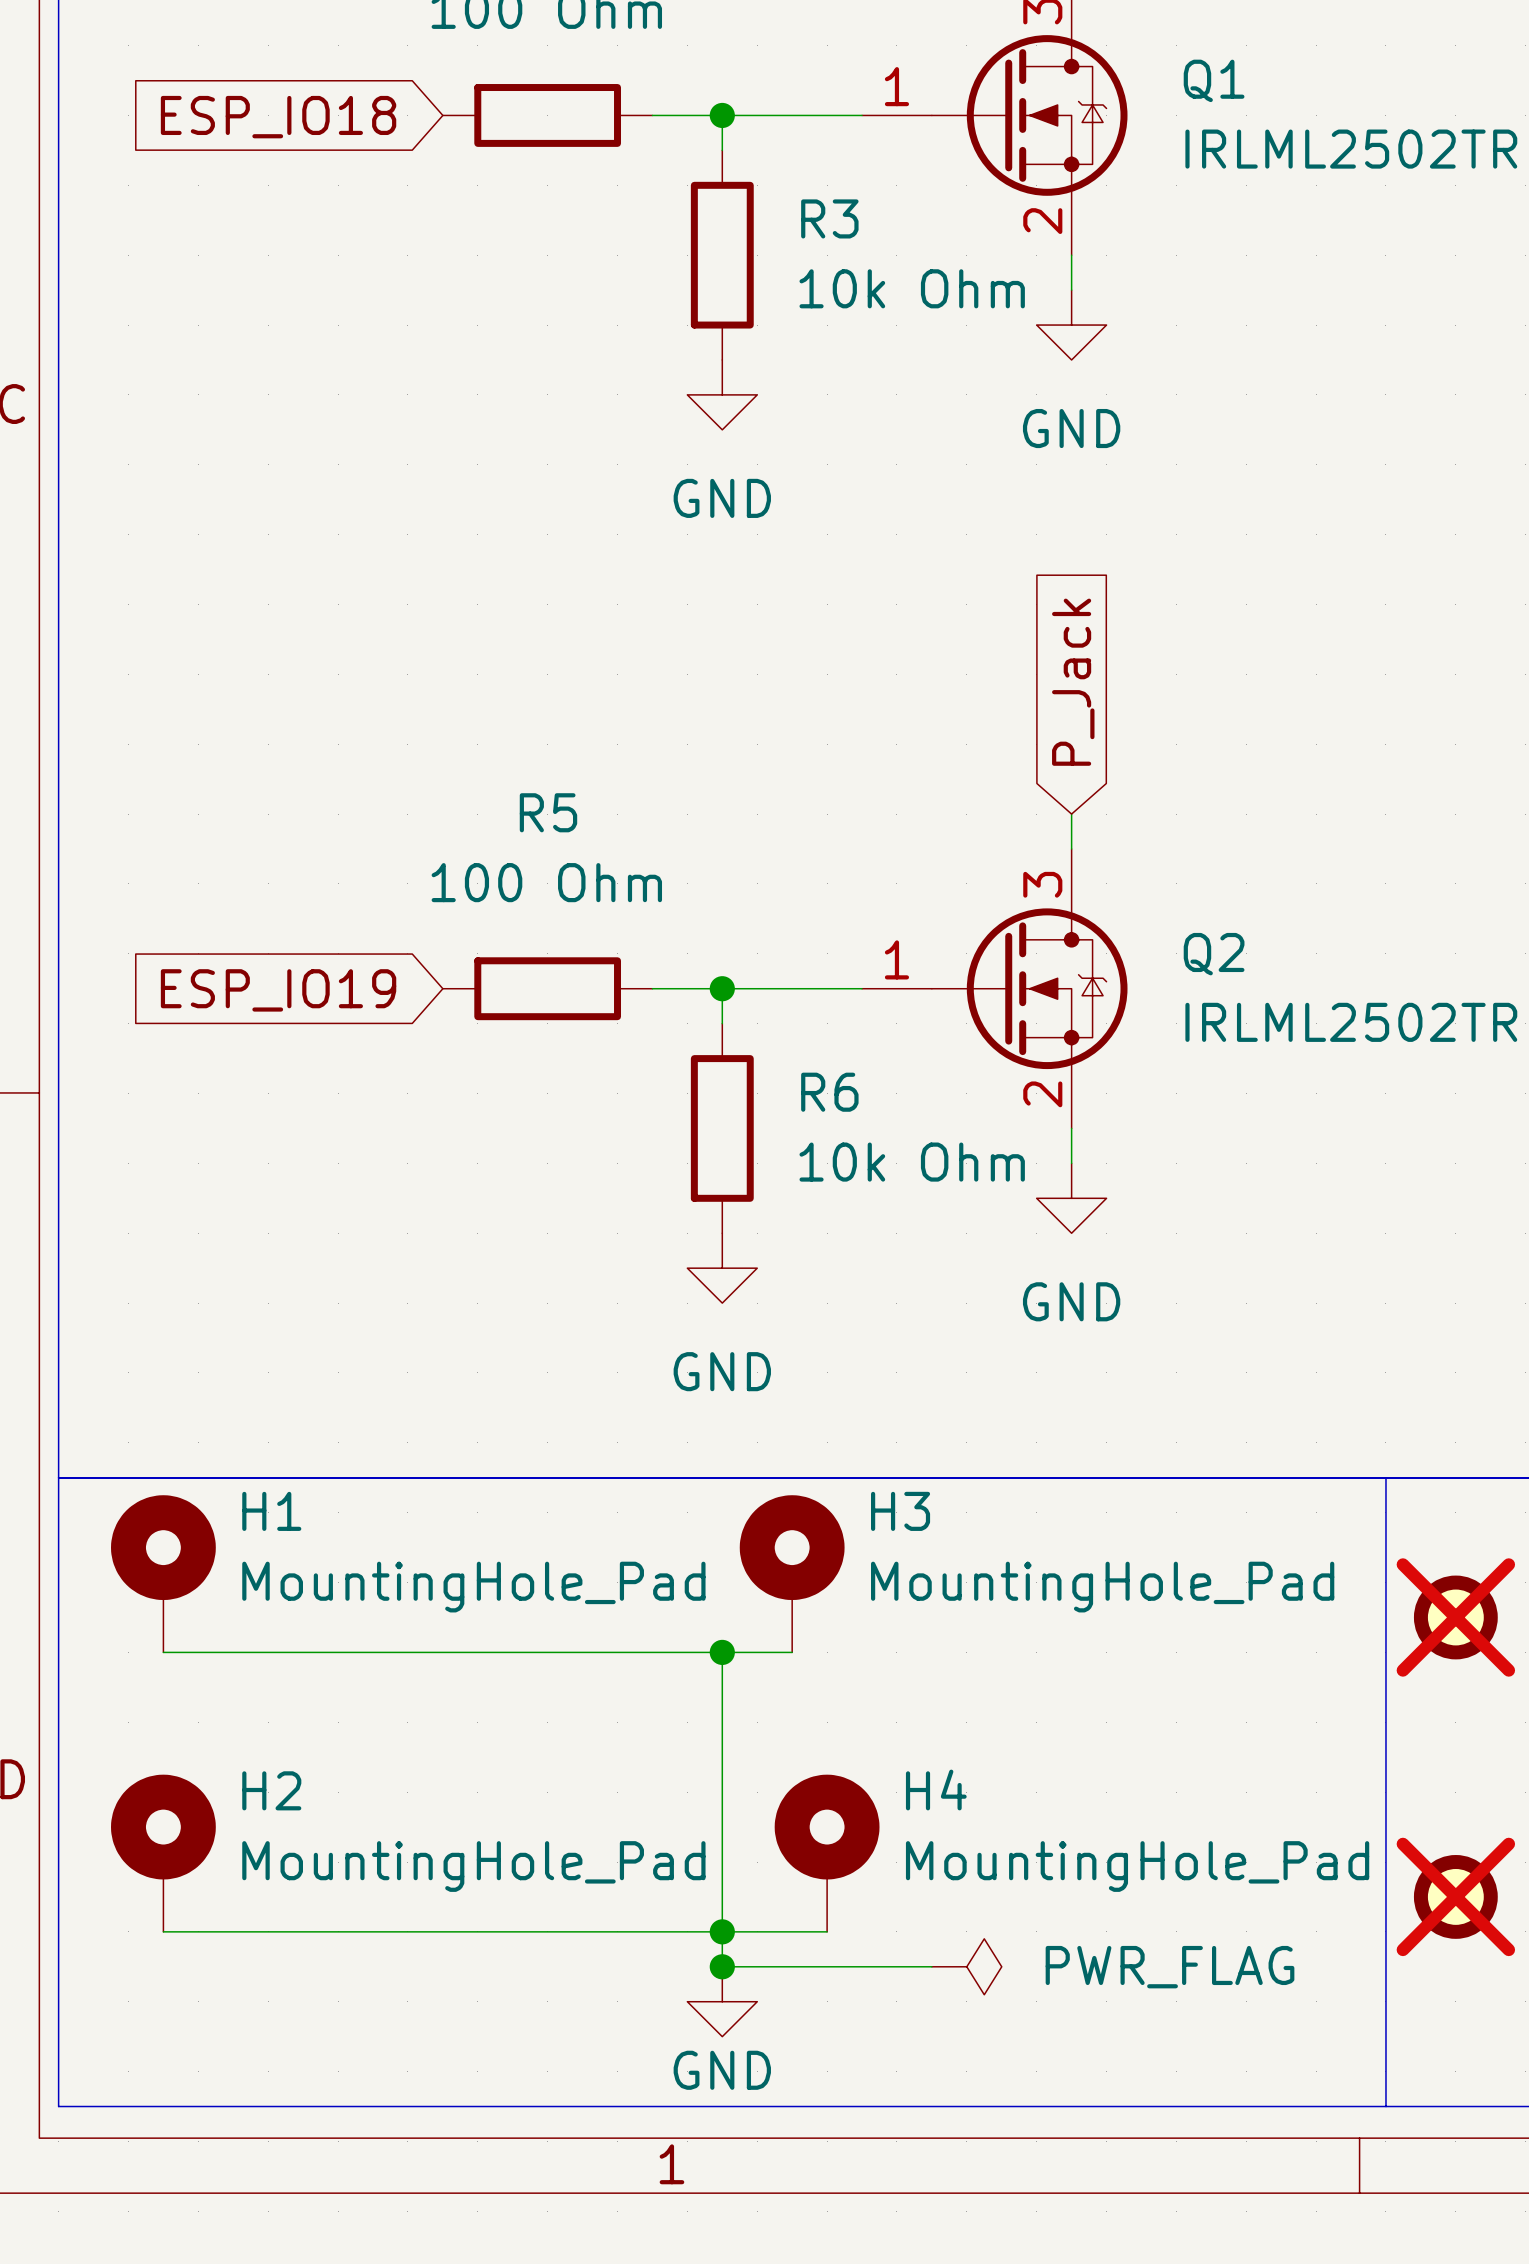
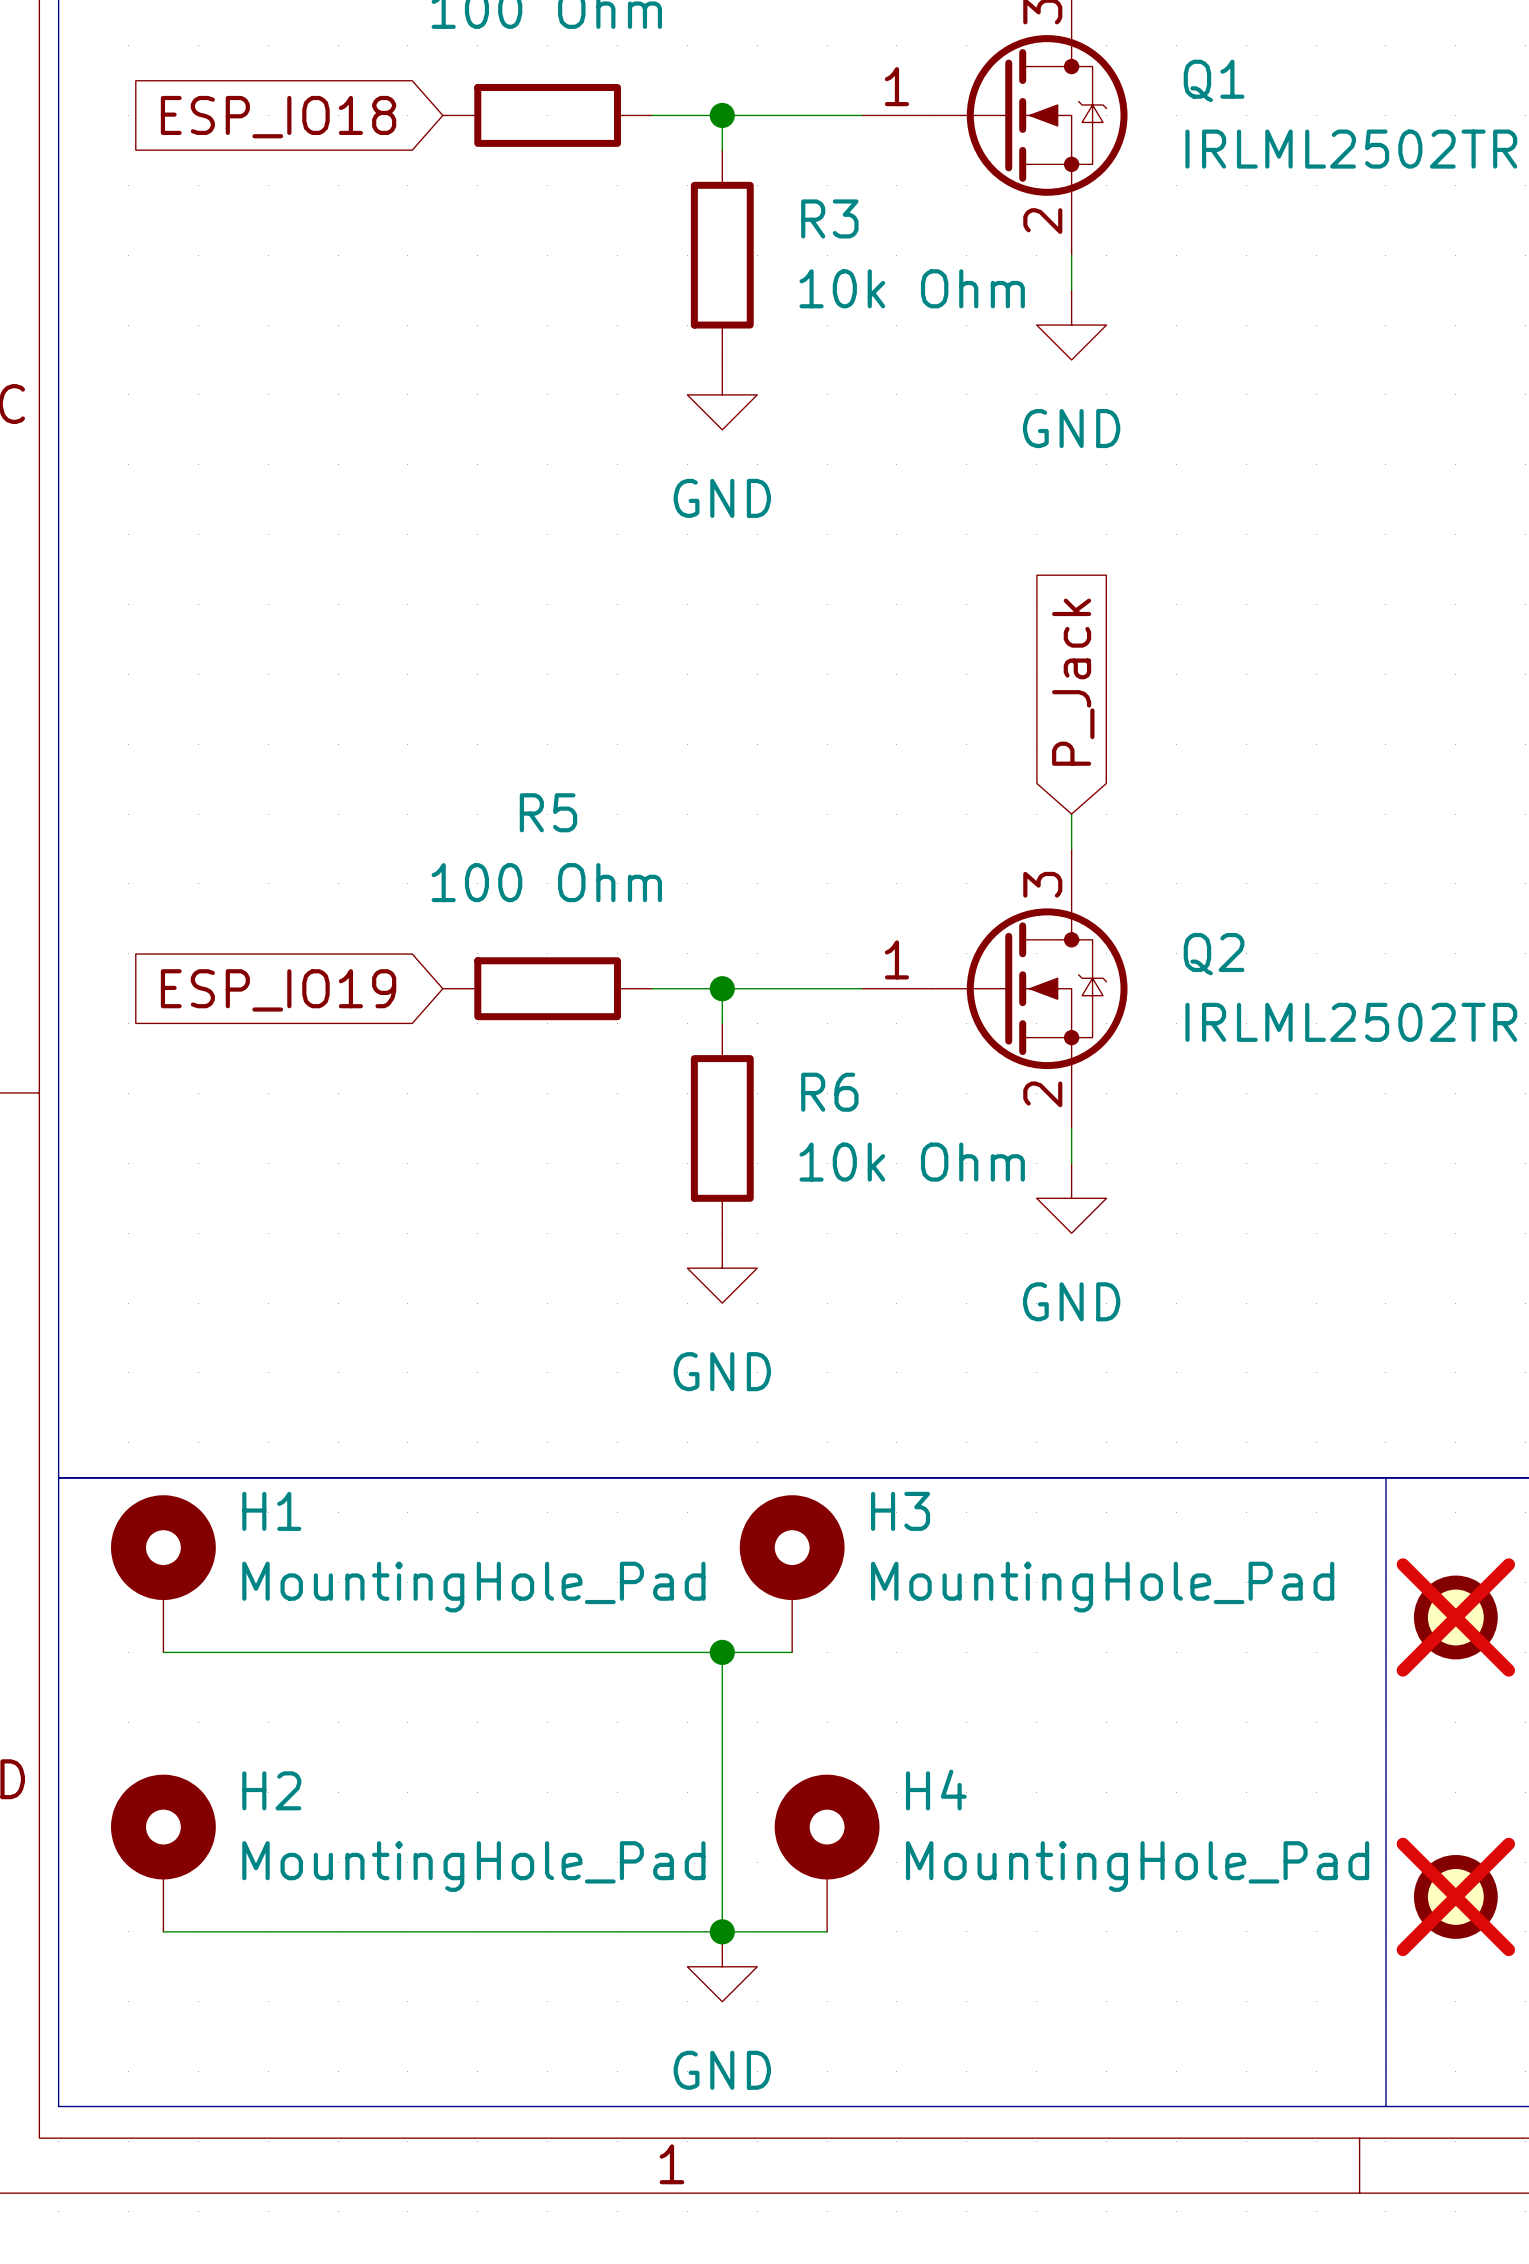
wire: (722, 1931) (722, 1966) (931, 1966) -> none
junction: (722, 1966) -> none
power symbol: PWR_FLAG (966, 1966) -> none
power symbol position: GND (722, 2001) -> GND (722, 1966)

